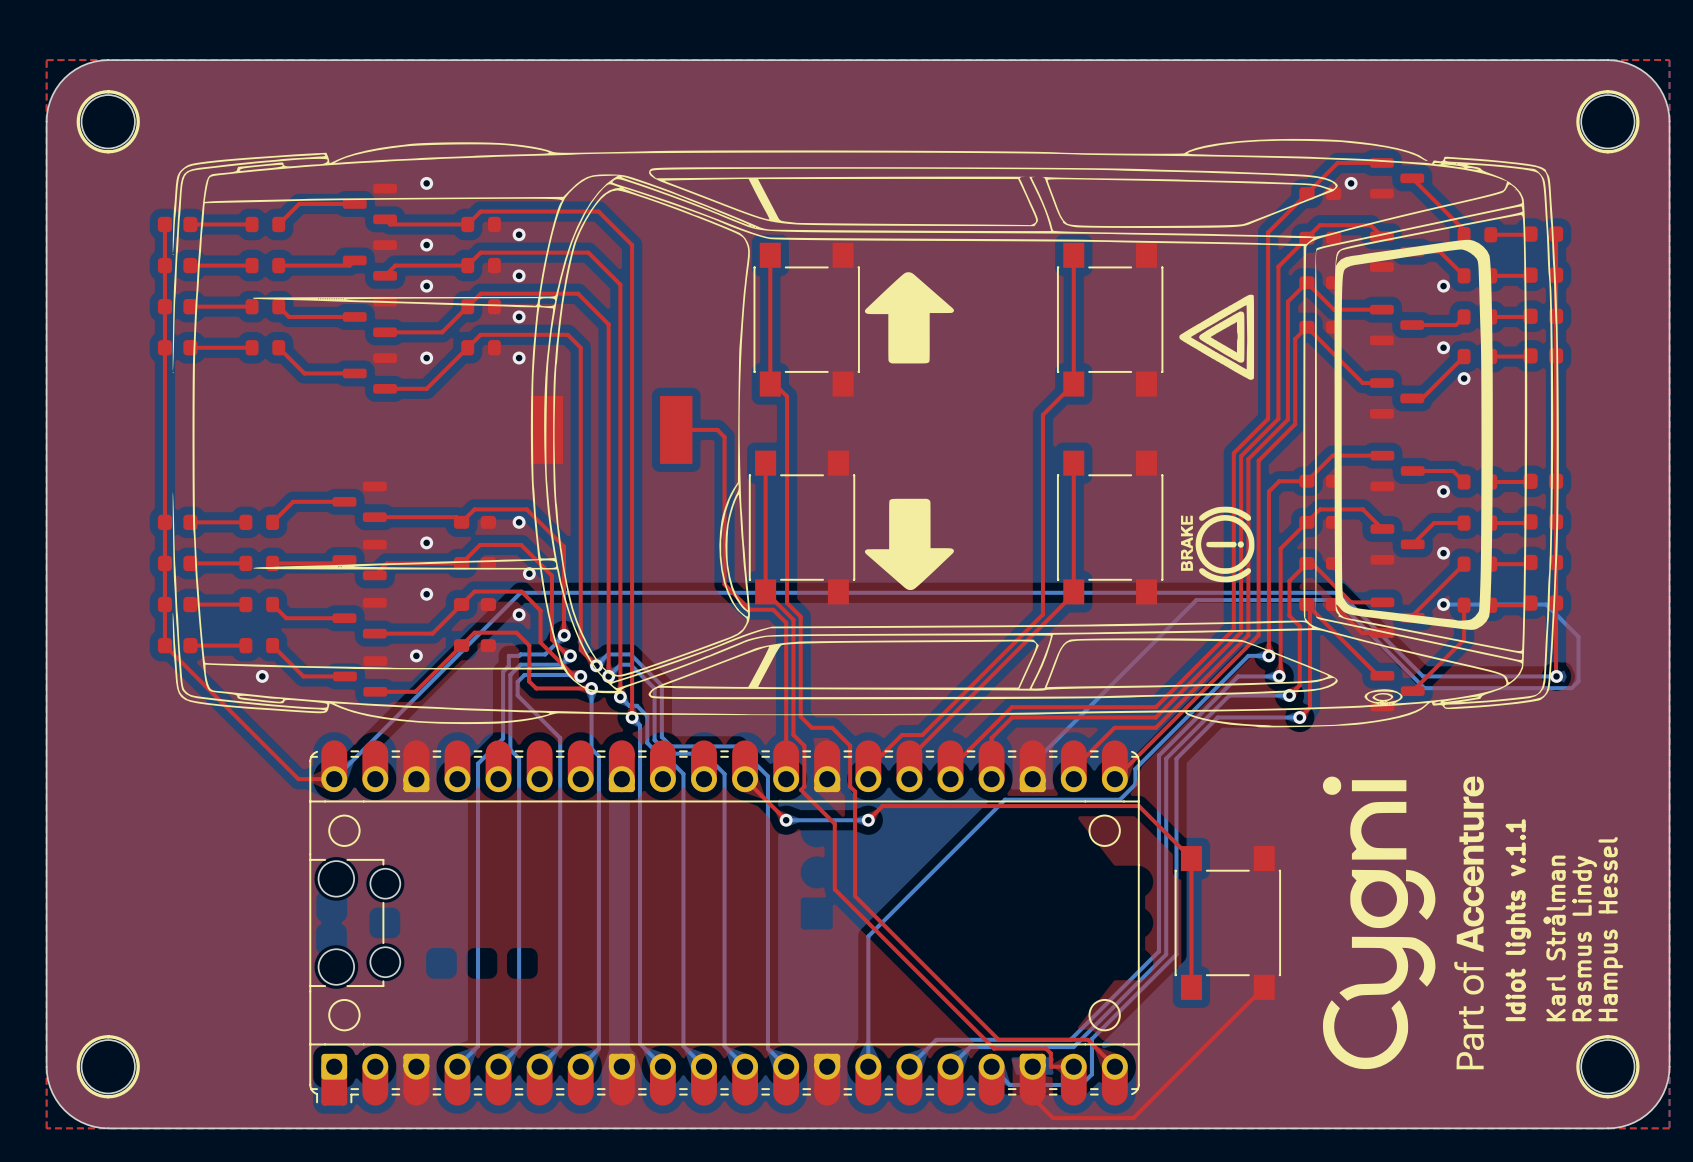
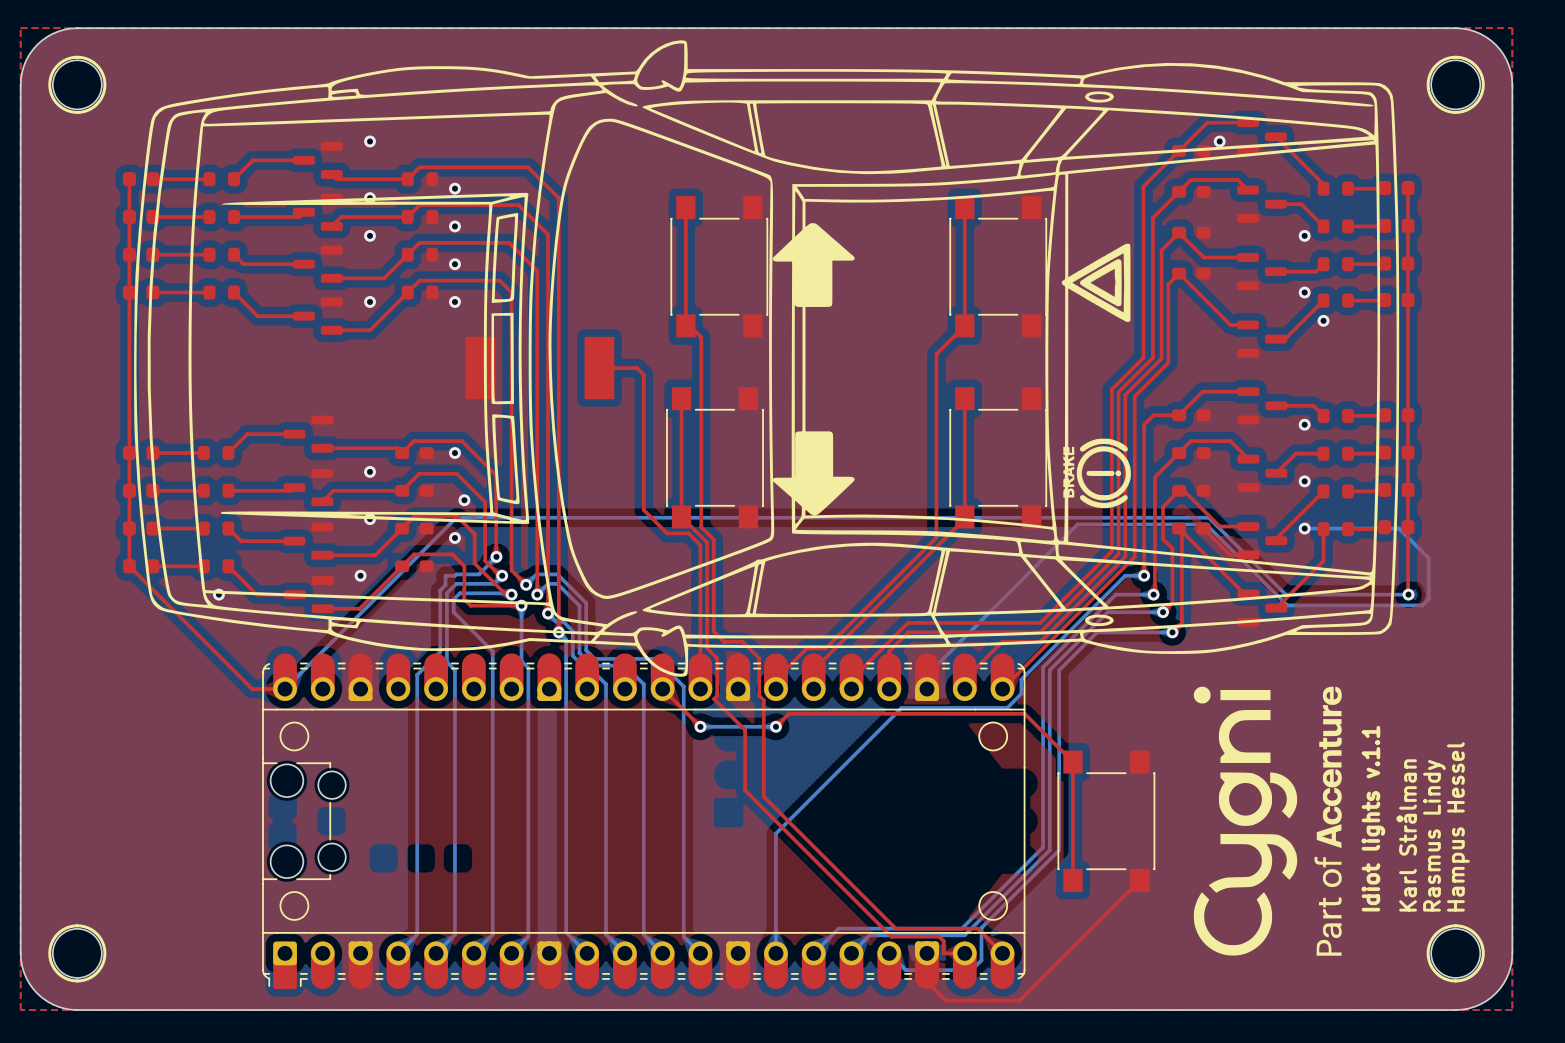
drawing shape: [172, 138, 1559, 728] -> [134, 40, 1400, 677]

